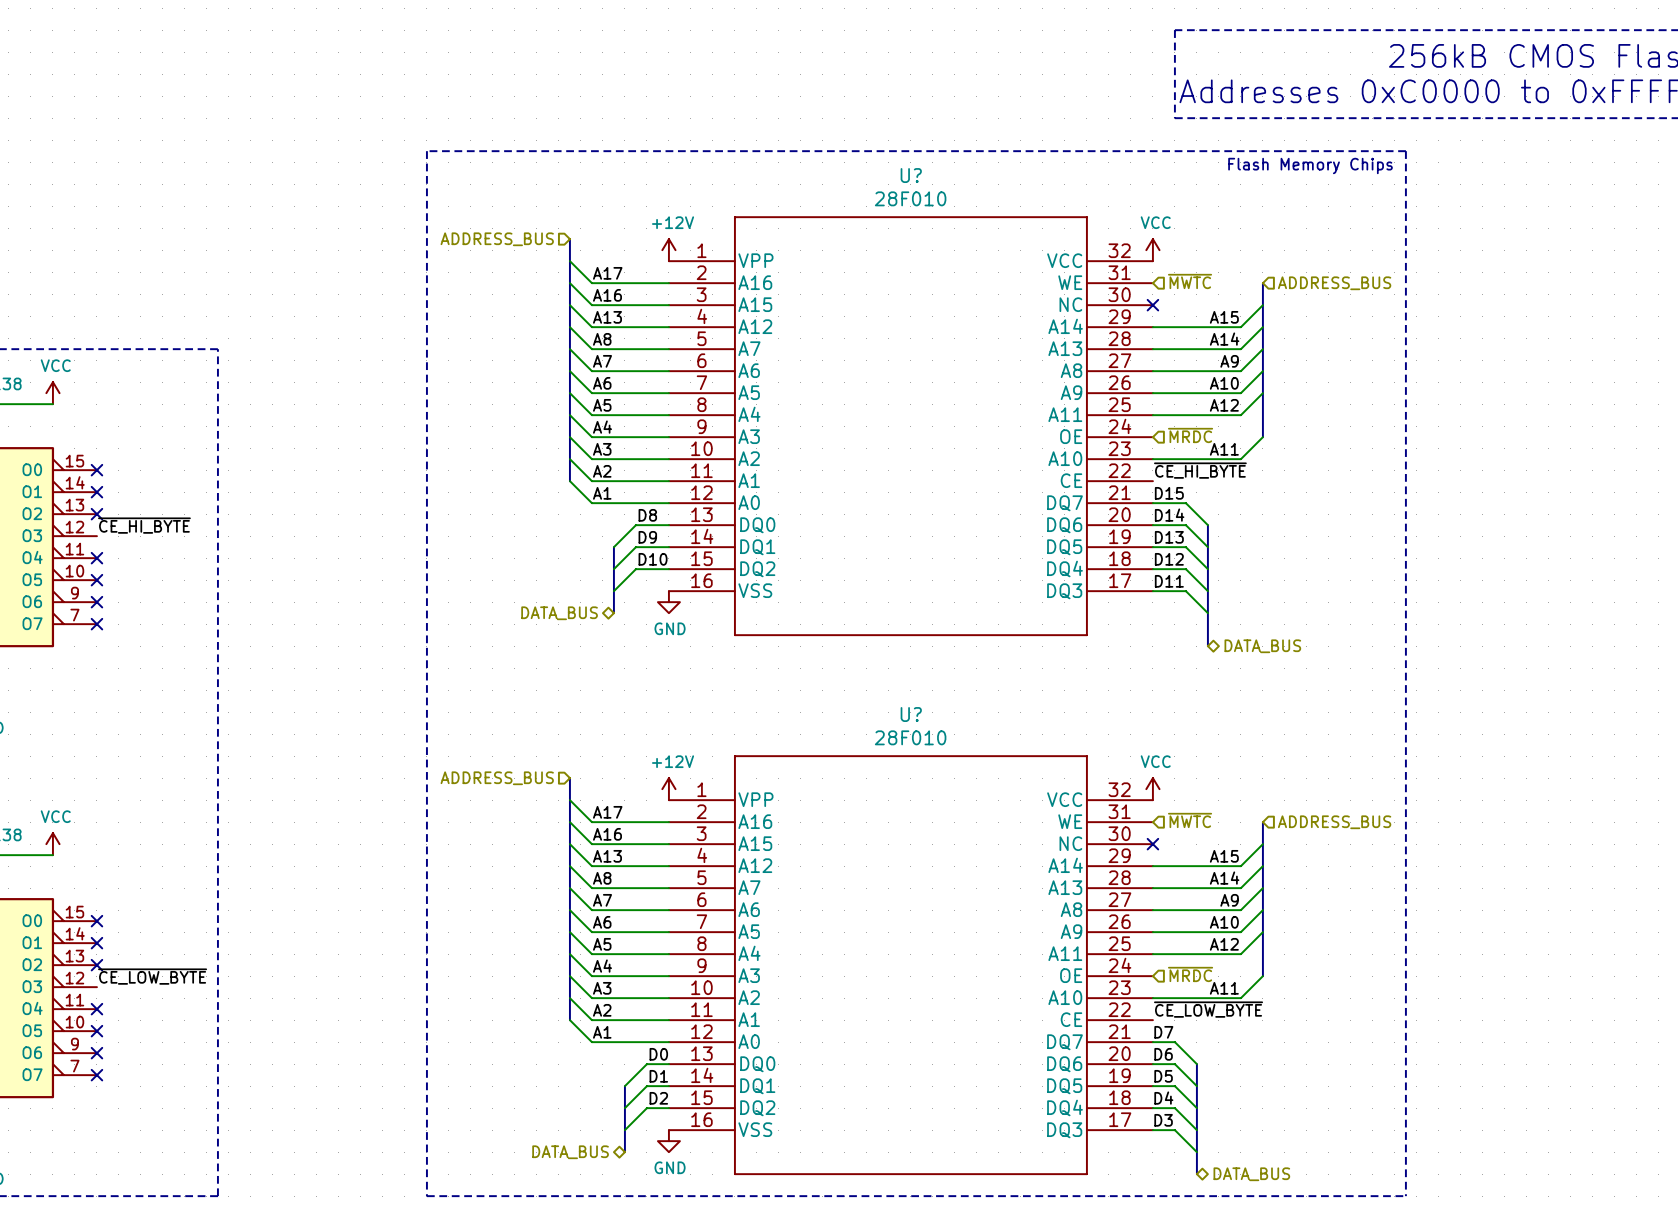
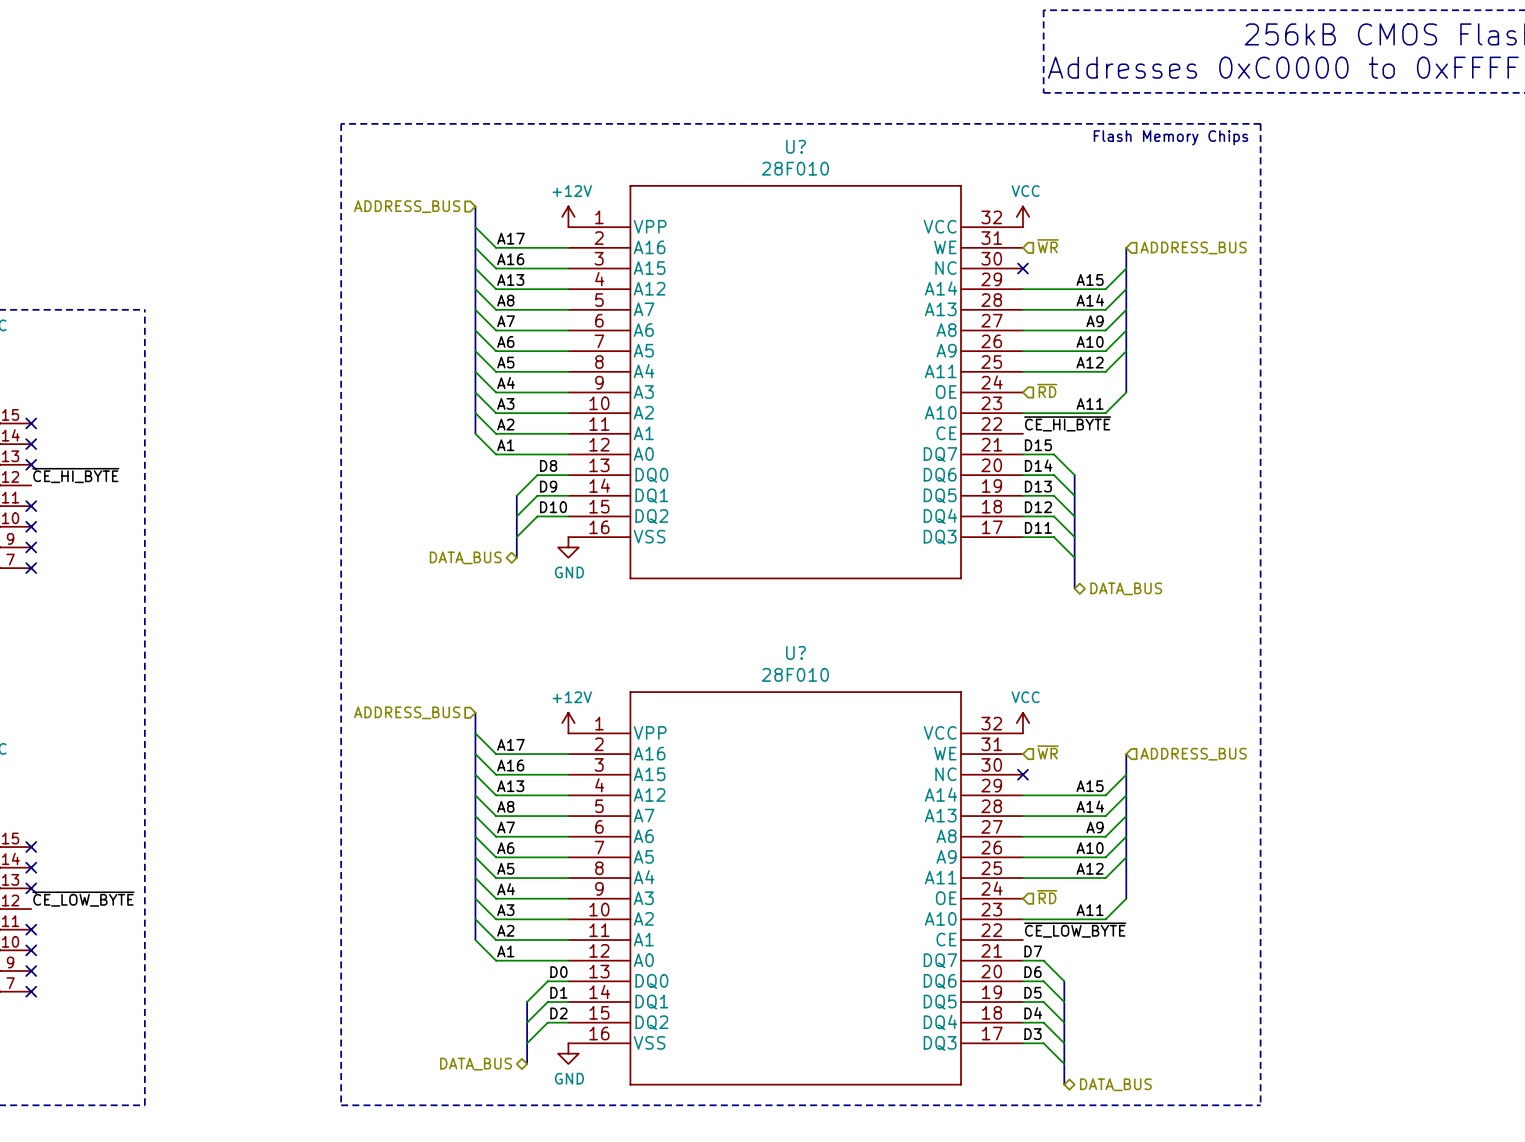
hierarchical label: ~{MWTC} (1190, 281) -> ~{WR} (1047, 246)
hierarchical label: ~{MRDC} (1190, 435) -> ~{RD} (1047, 390)
hierarchical label: ~{MWTC} (1190, 820) -> ~{WR} (1047, 752)
hierarchical label: ~{MRDC} (1190, 974) -> ~{RD} (1047, 897)

